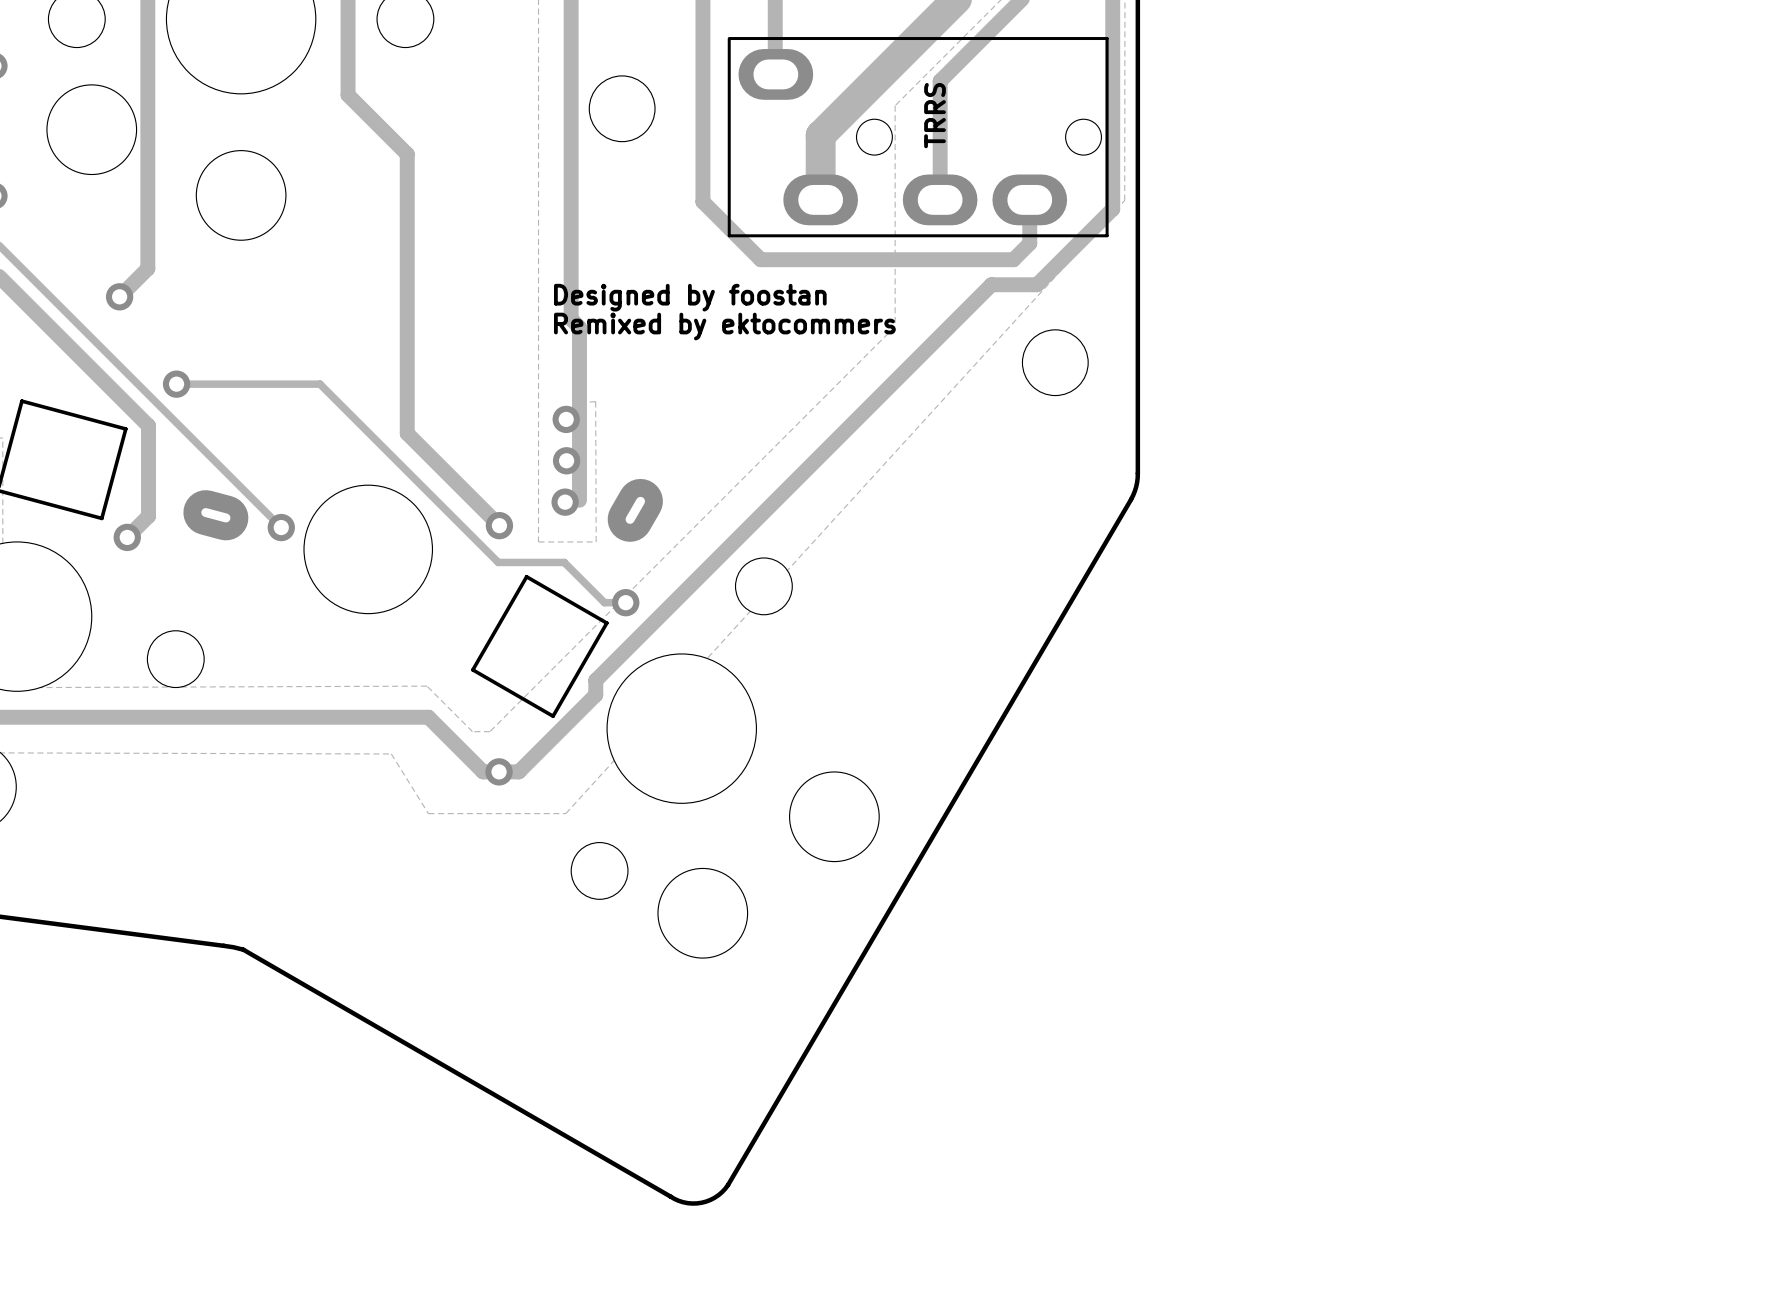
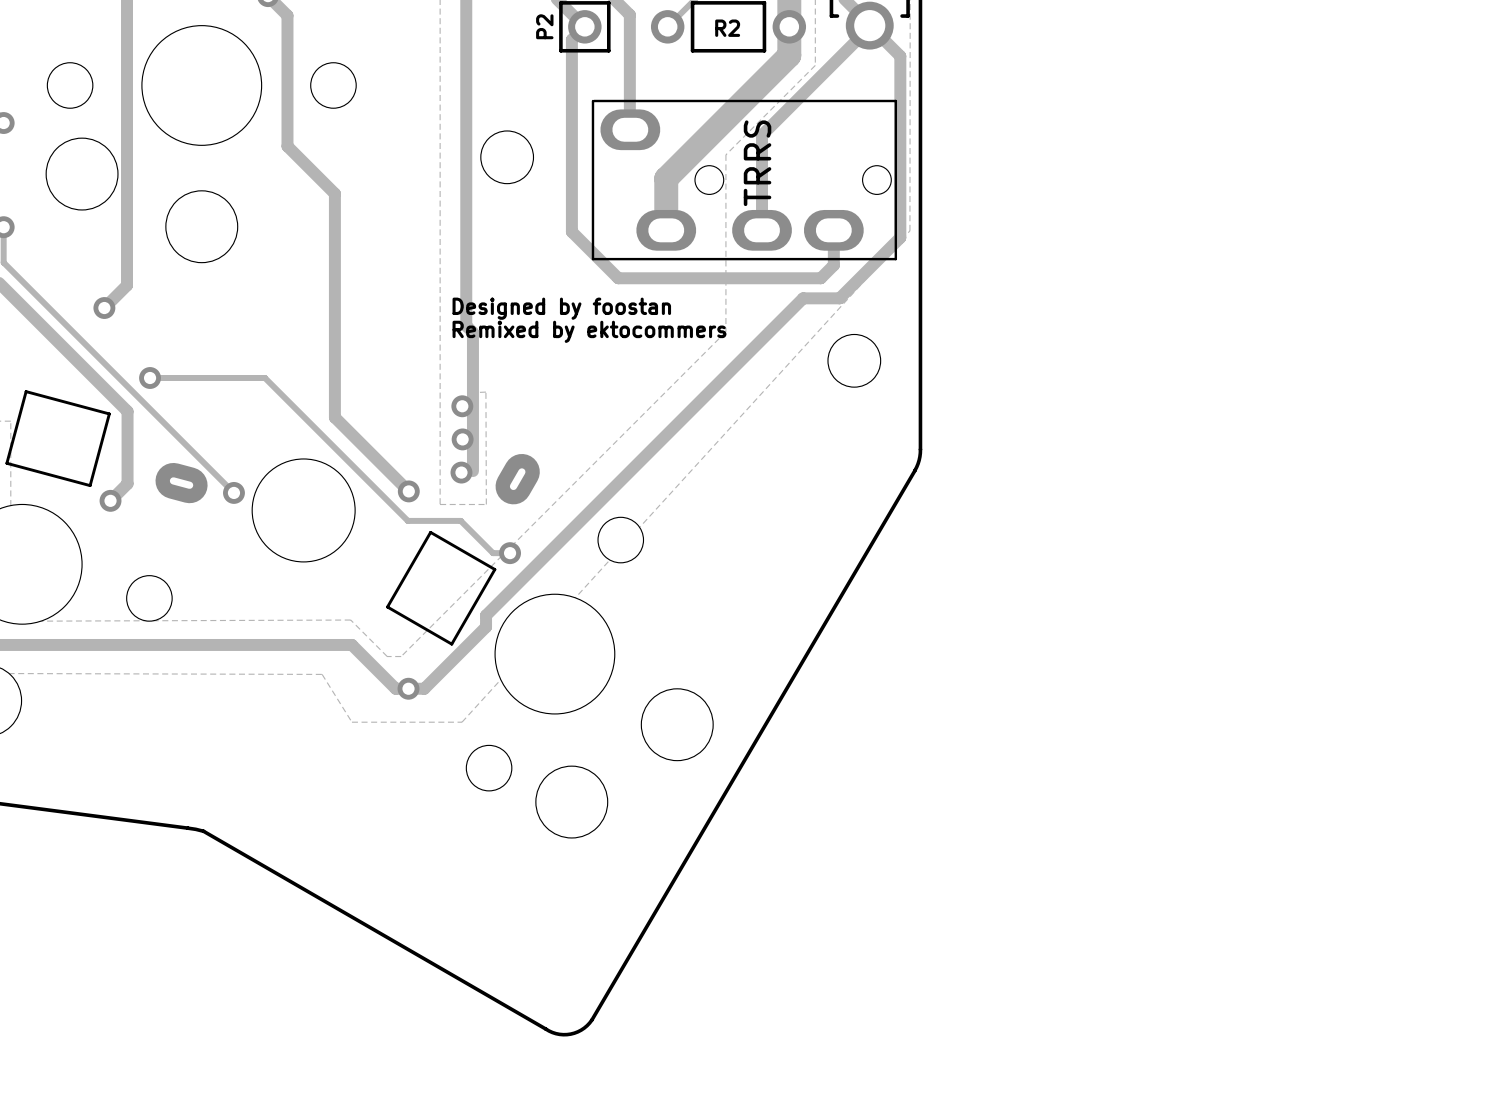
part footprint: [727, 37, 1109, 238] -> [591, 99, 898, 261]

